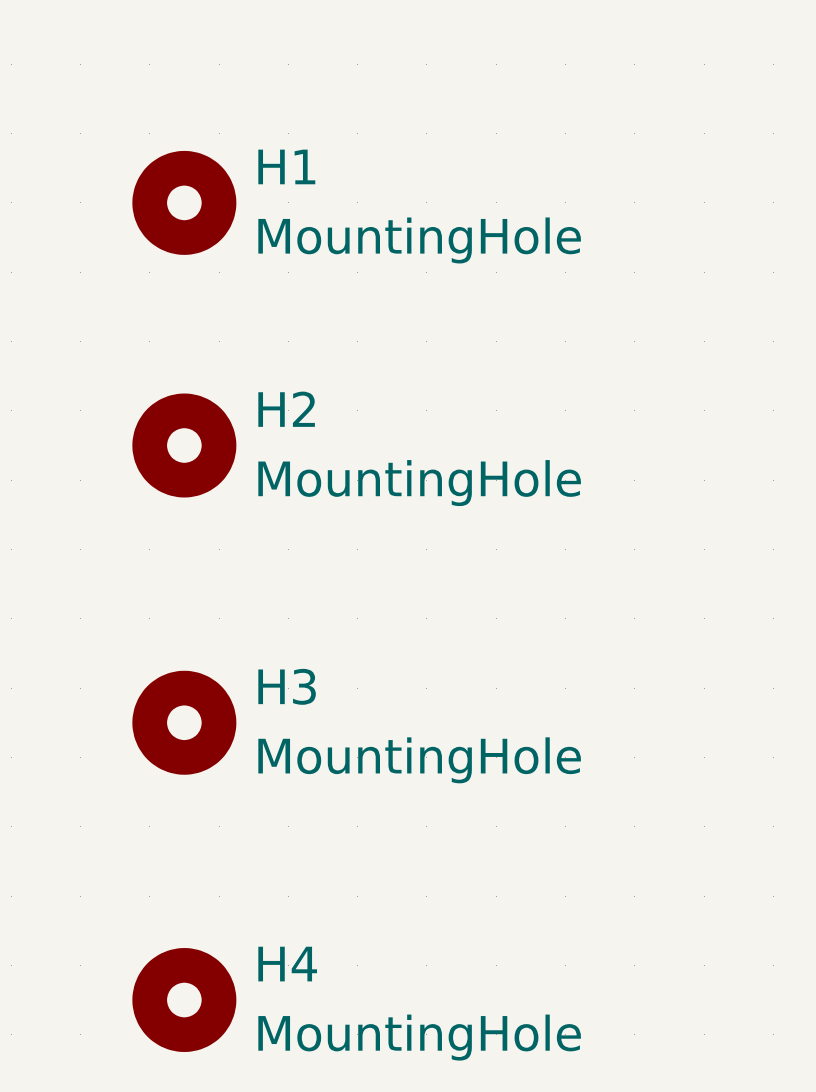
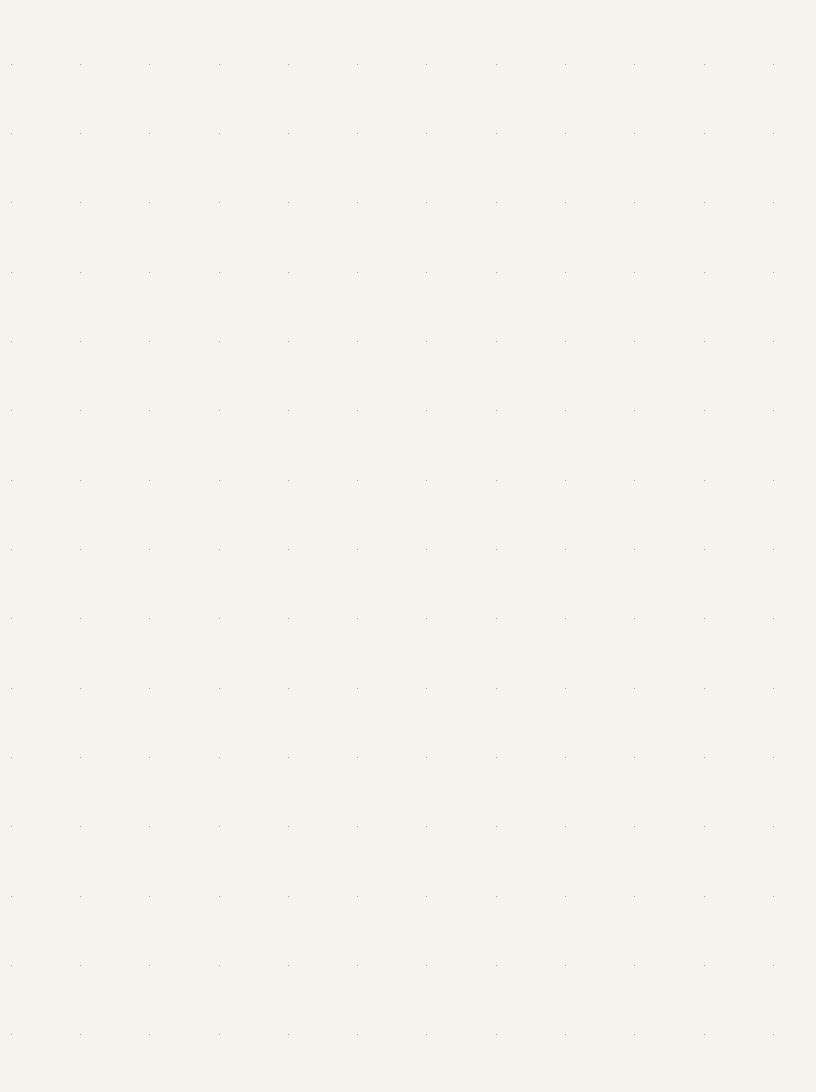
H1: MountingHole (184, 202) -> none
H2: MountingHole (184, 445) -> none
H3: MountingHole (184, 722) -> none
H4: MountingHole (184, 1000) -> none

